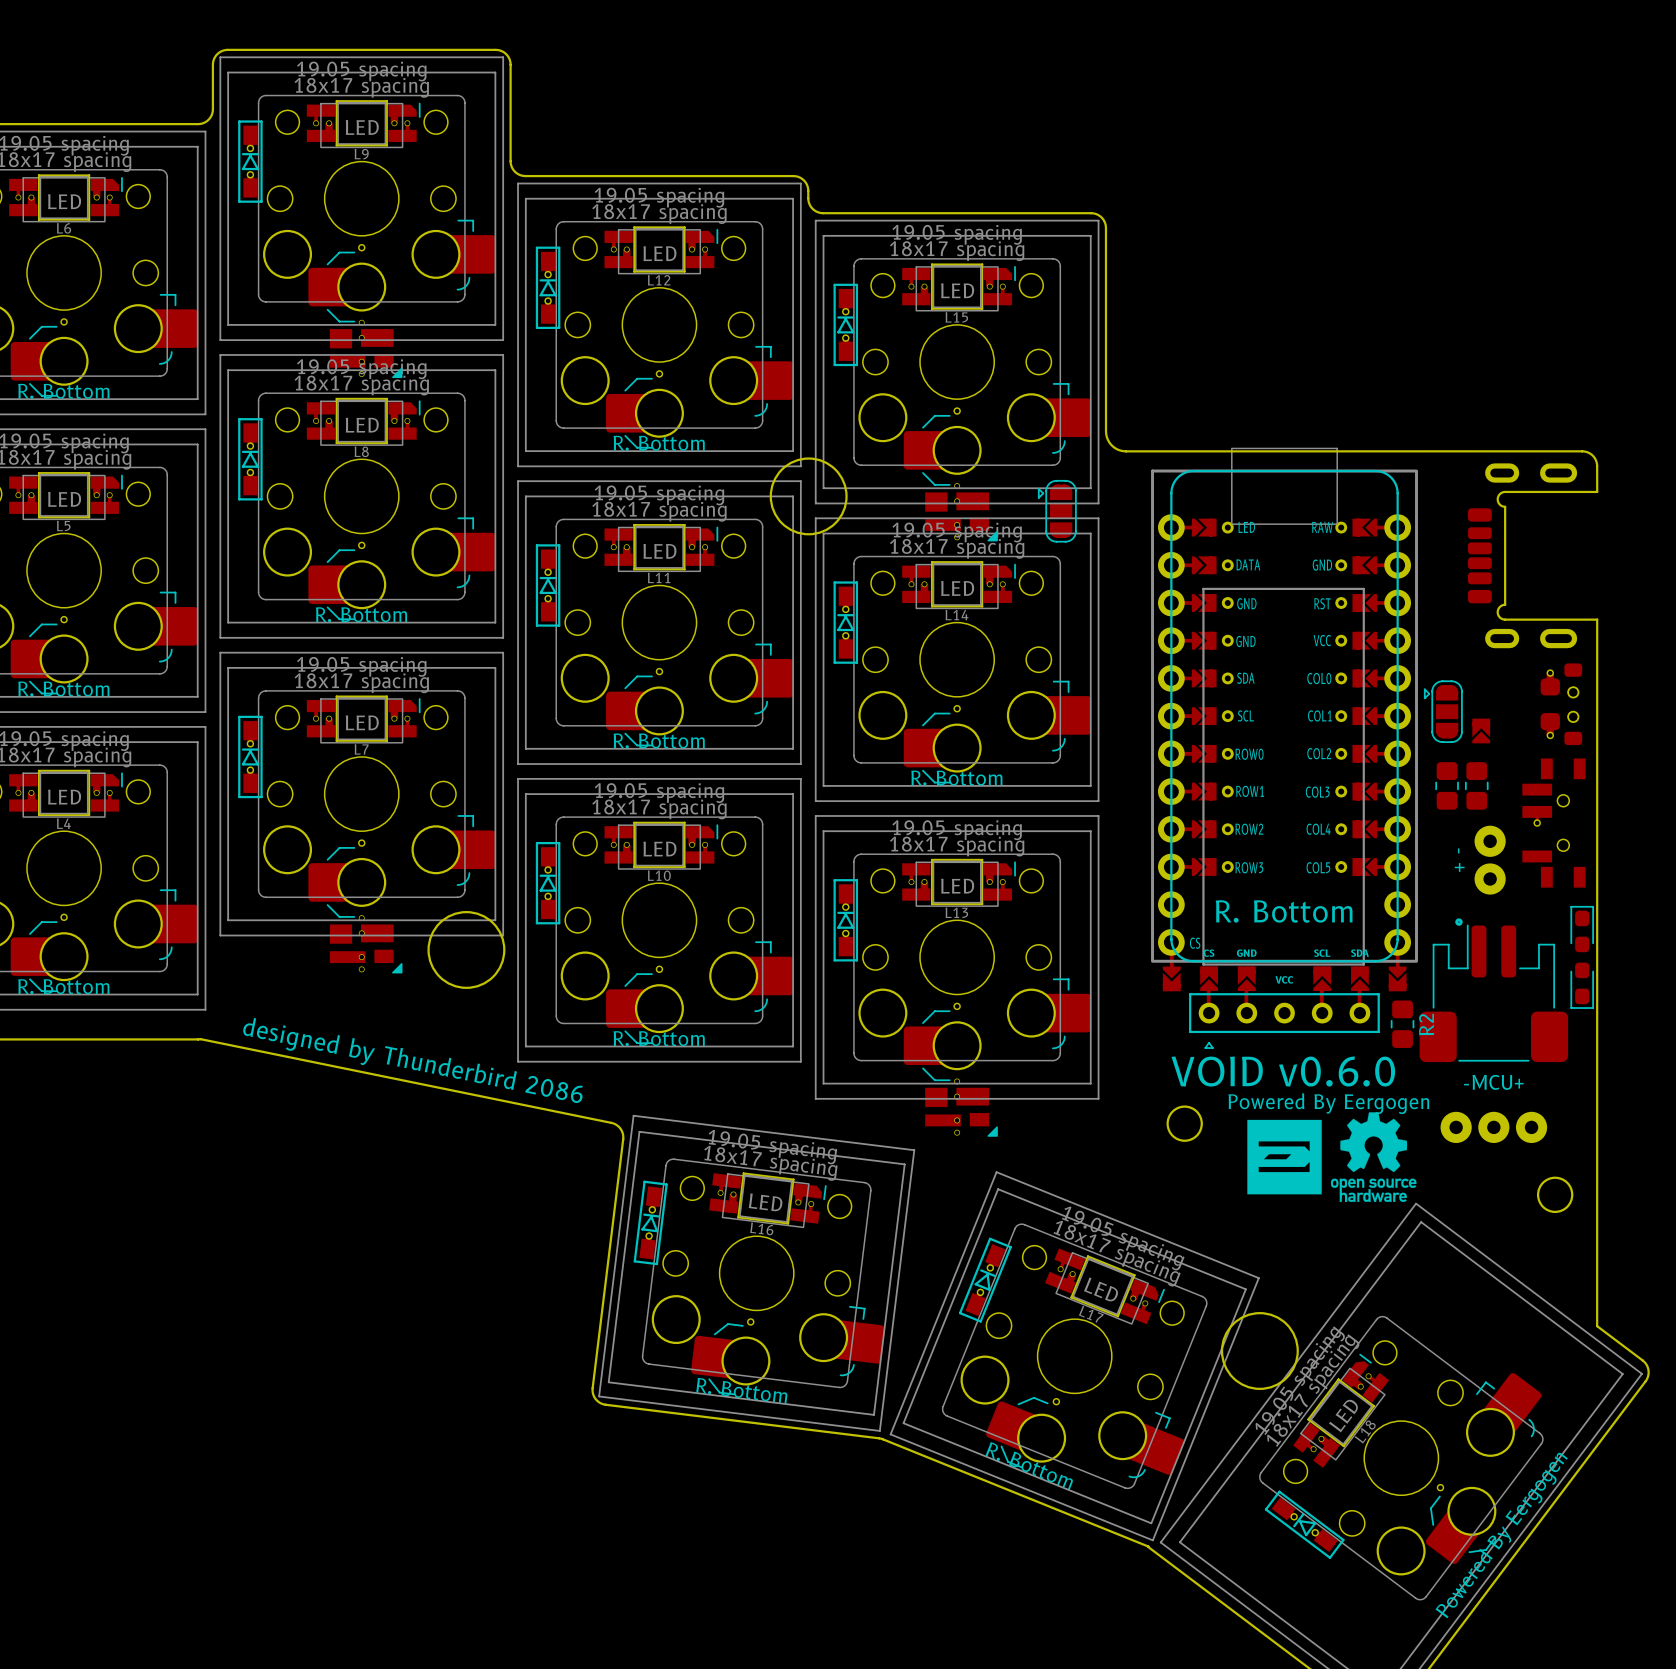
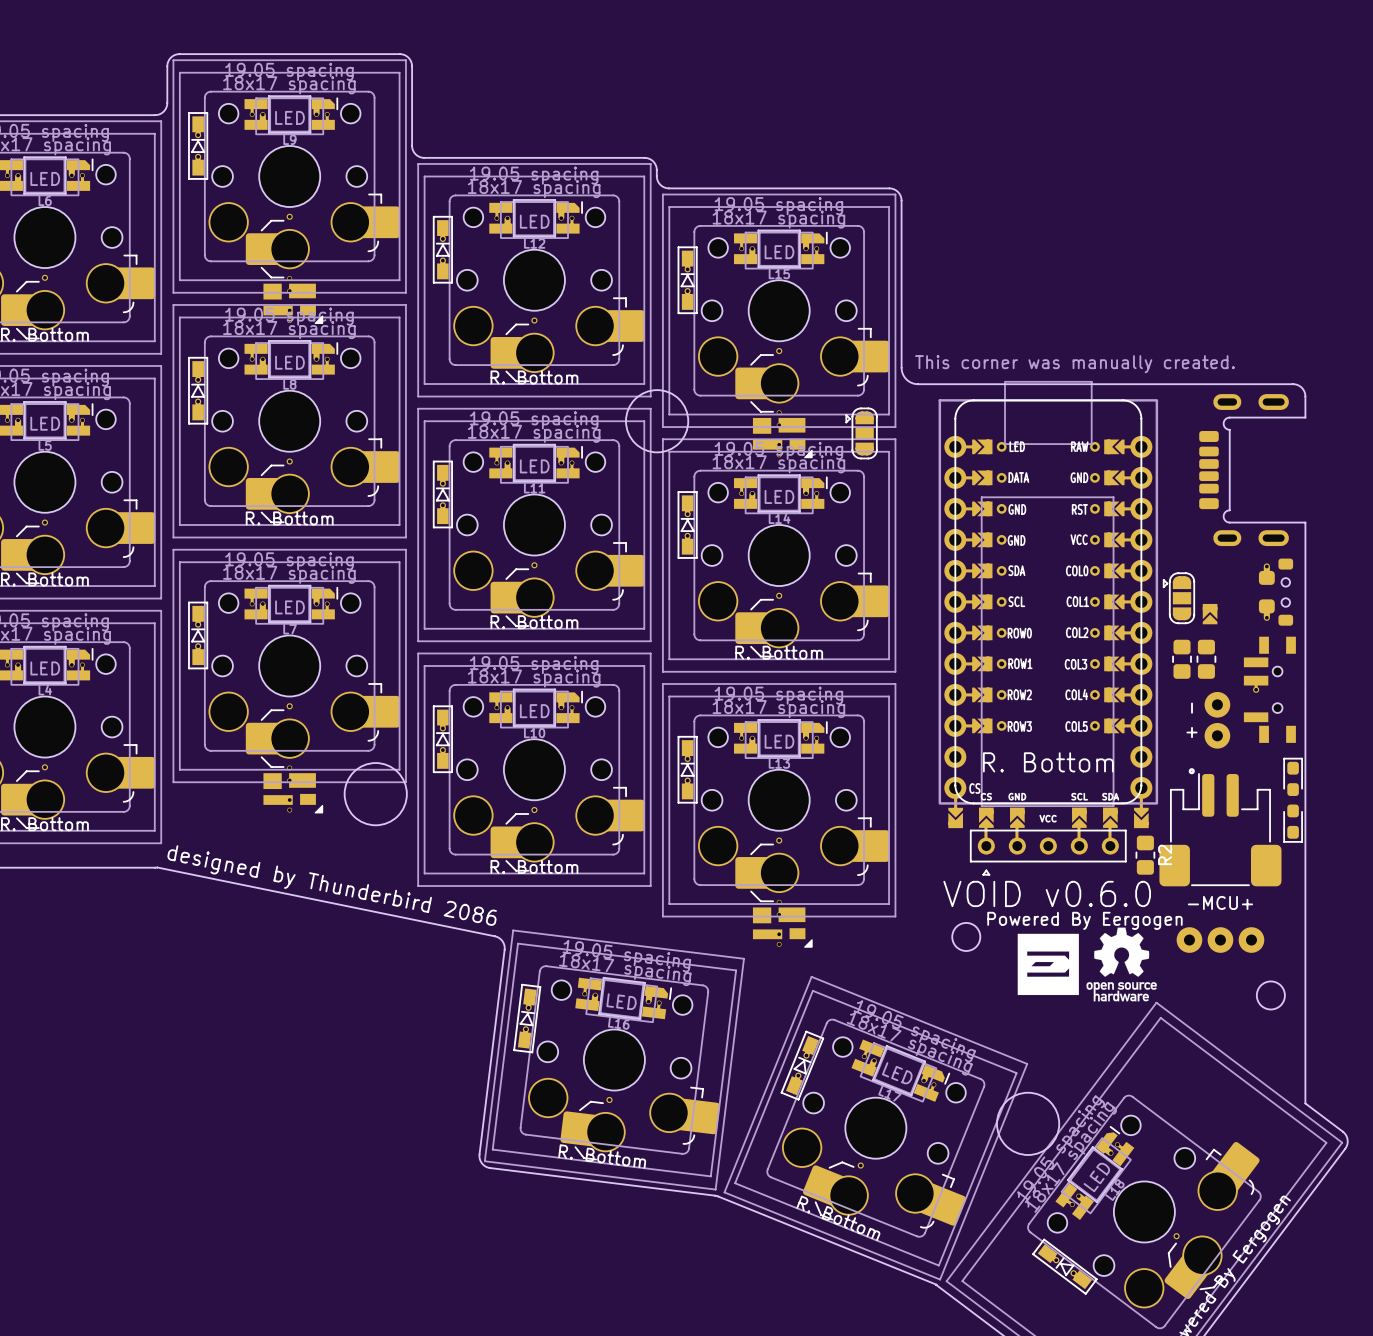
text: none -> This corner was manually created. (1074, 364)

